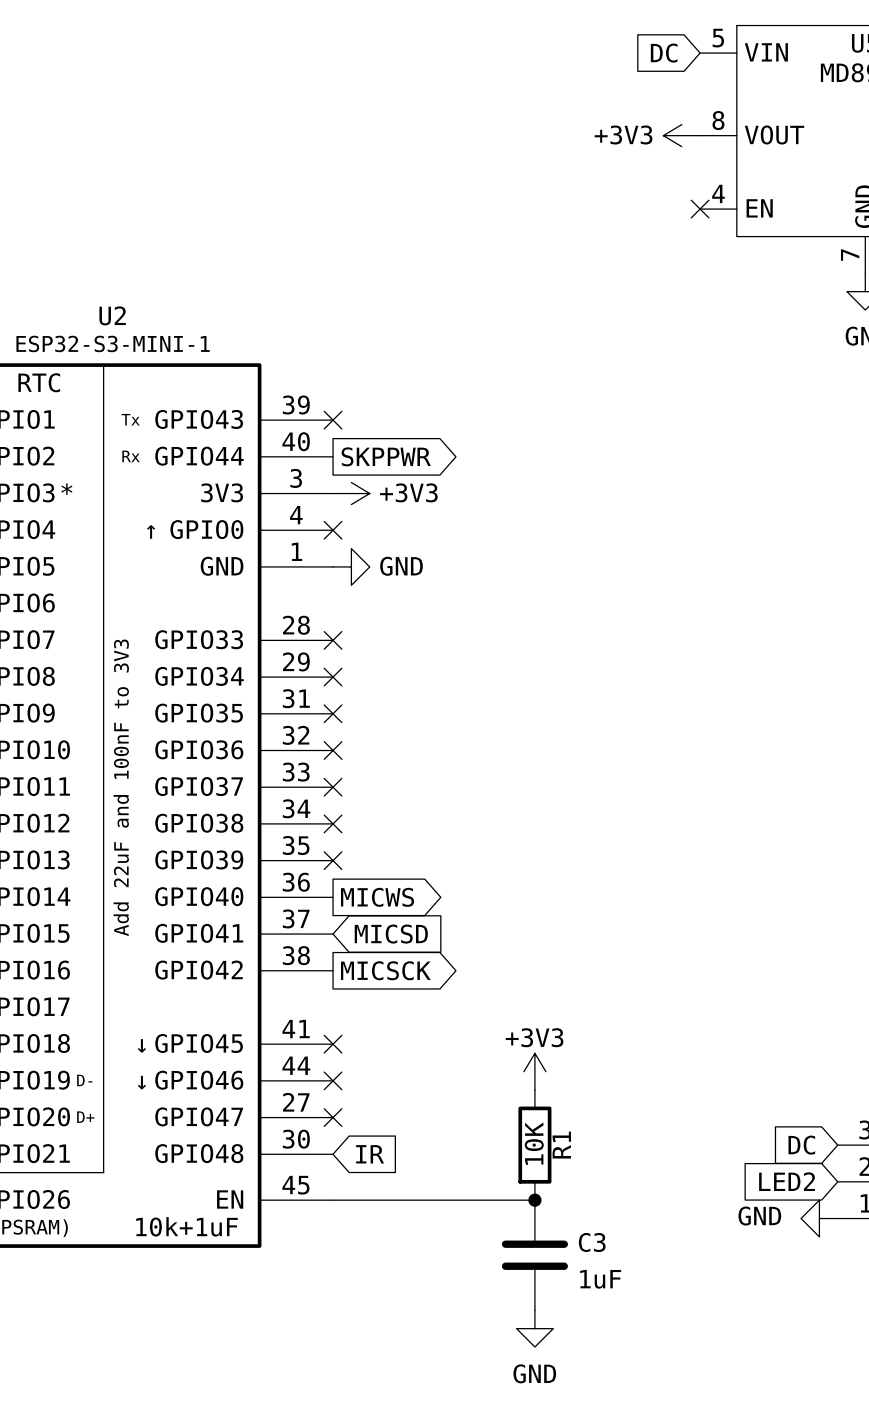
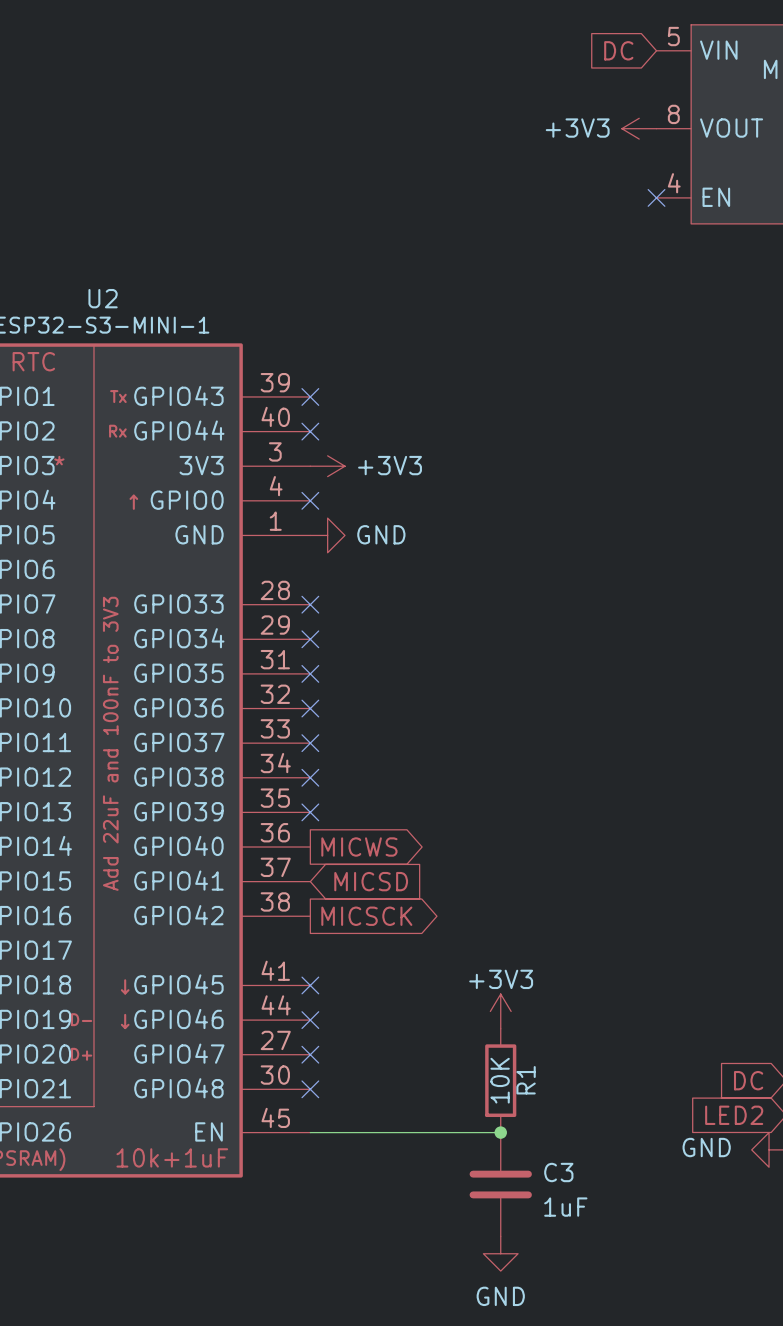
no-connect mark: none -> (310, 431)
global label: SKPPWR (386, 456) -> none
no-connect mark: none -> (310, 1089)
global label: IR (370, 1154) -> none

